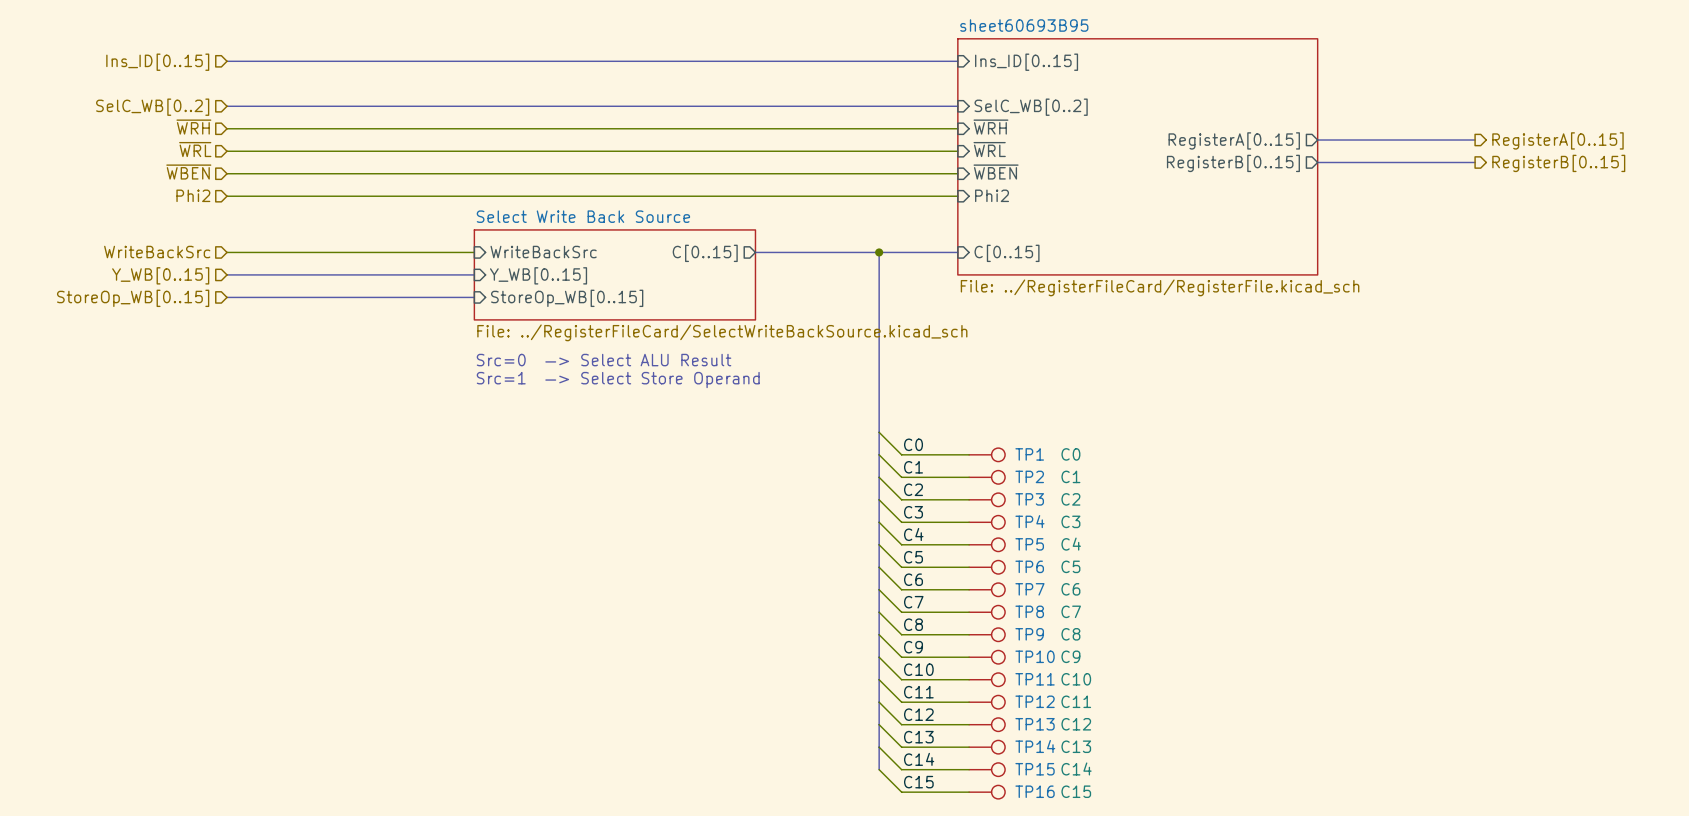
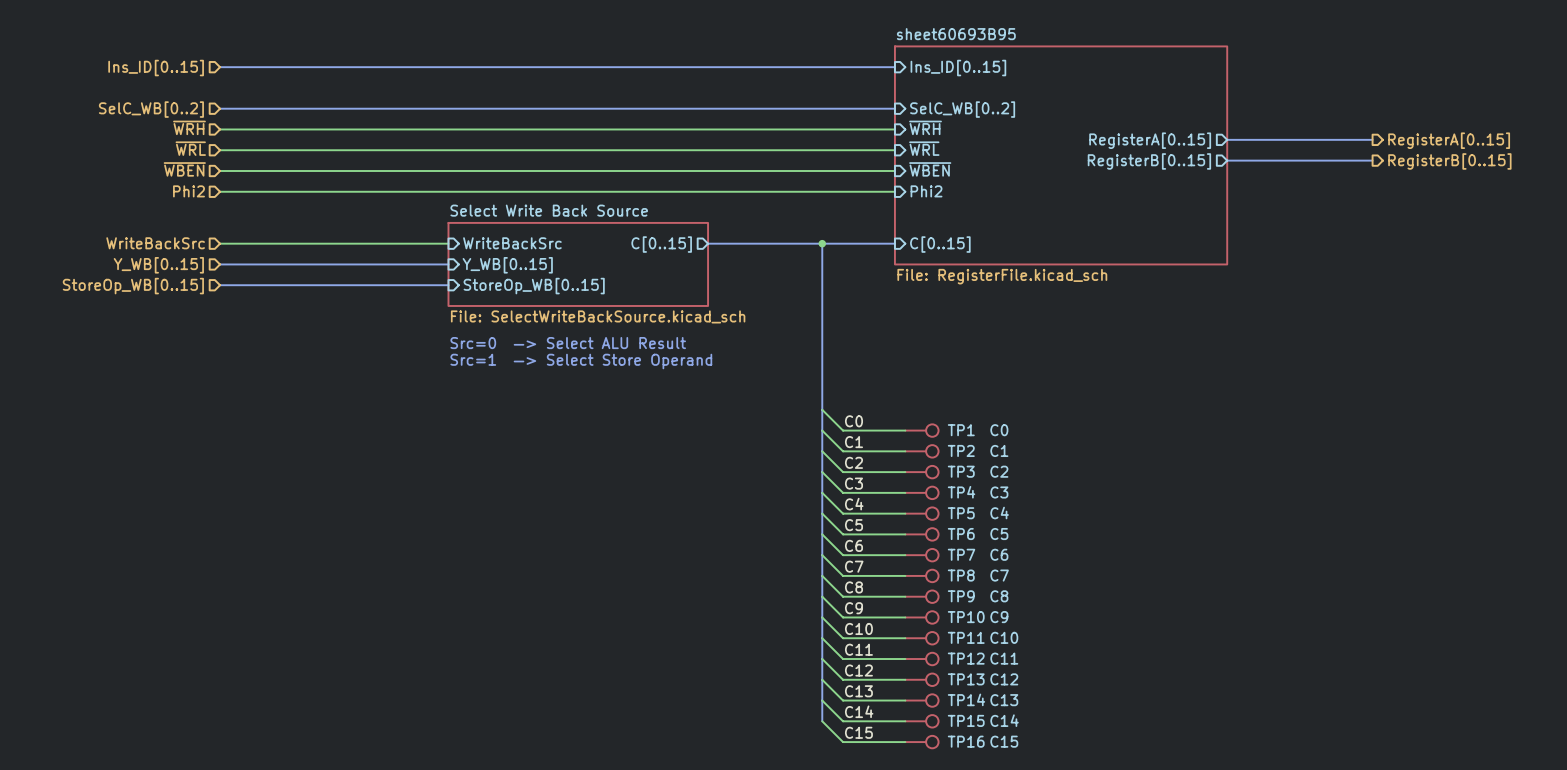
sheet sheet60693B95 value: File: ../RegisterFileCard/RegisterFile.kicad_sch (1160, 287) -> File: RegisterFile.kicad_sch (1002, 276)
sheet Select Write Back Source value: File: ../RegisterFileCard/SelectWriteBackSource.kicad_sch (722, 332) -> File: SelectWriteBackSource.kicad_sch (598, 316)

